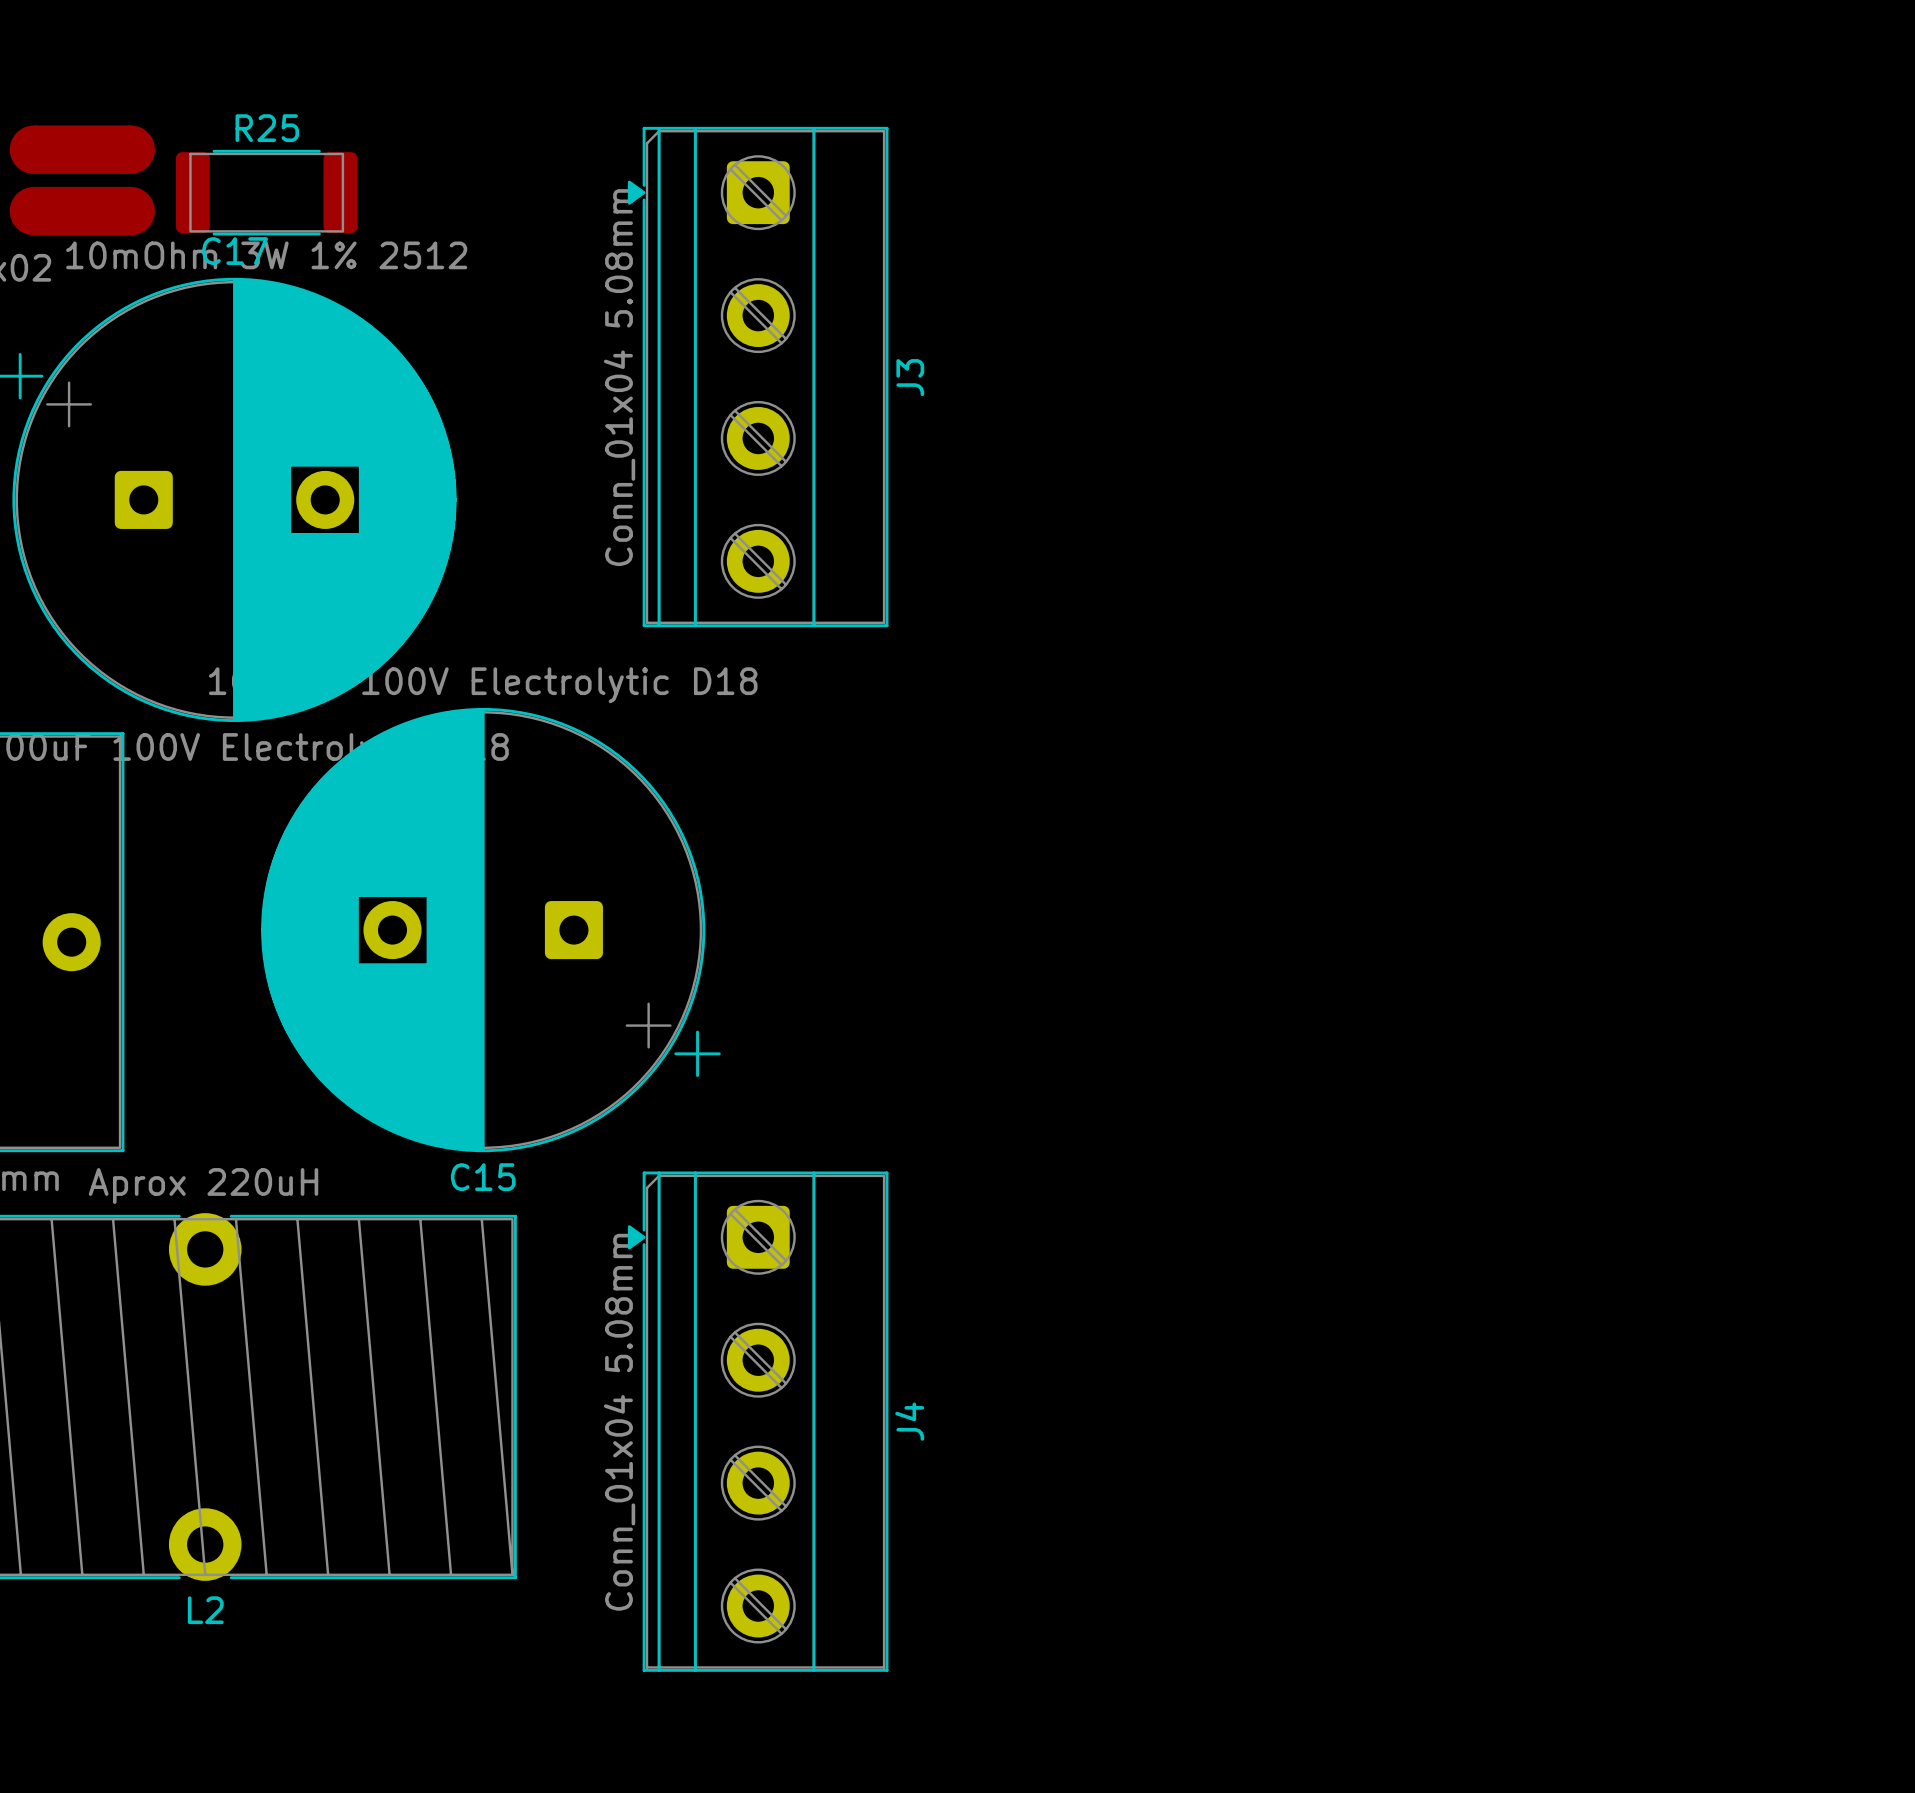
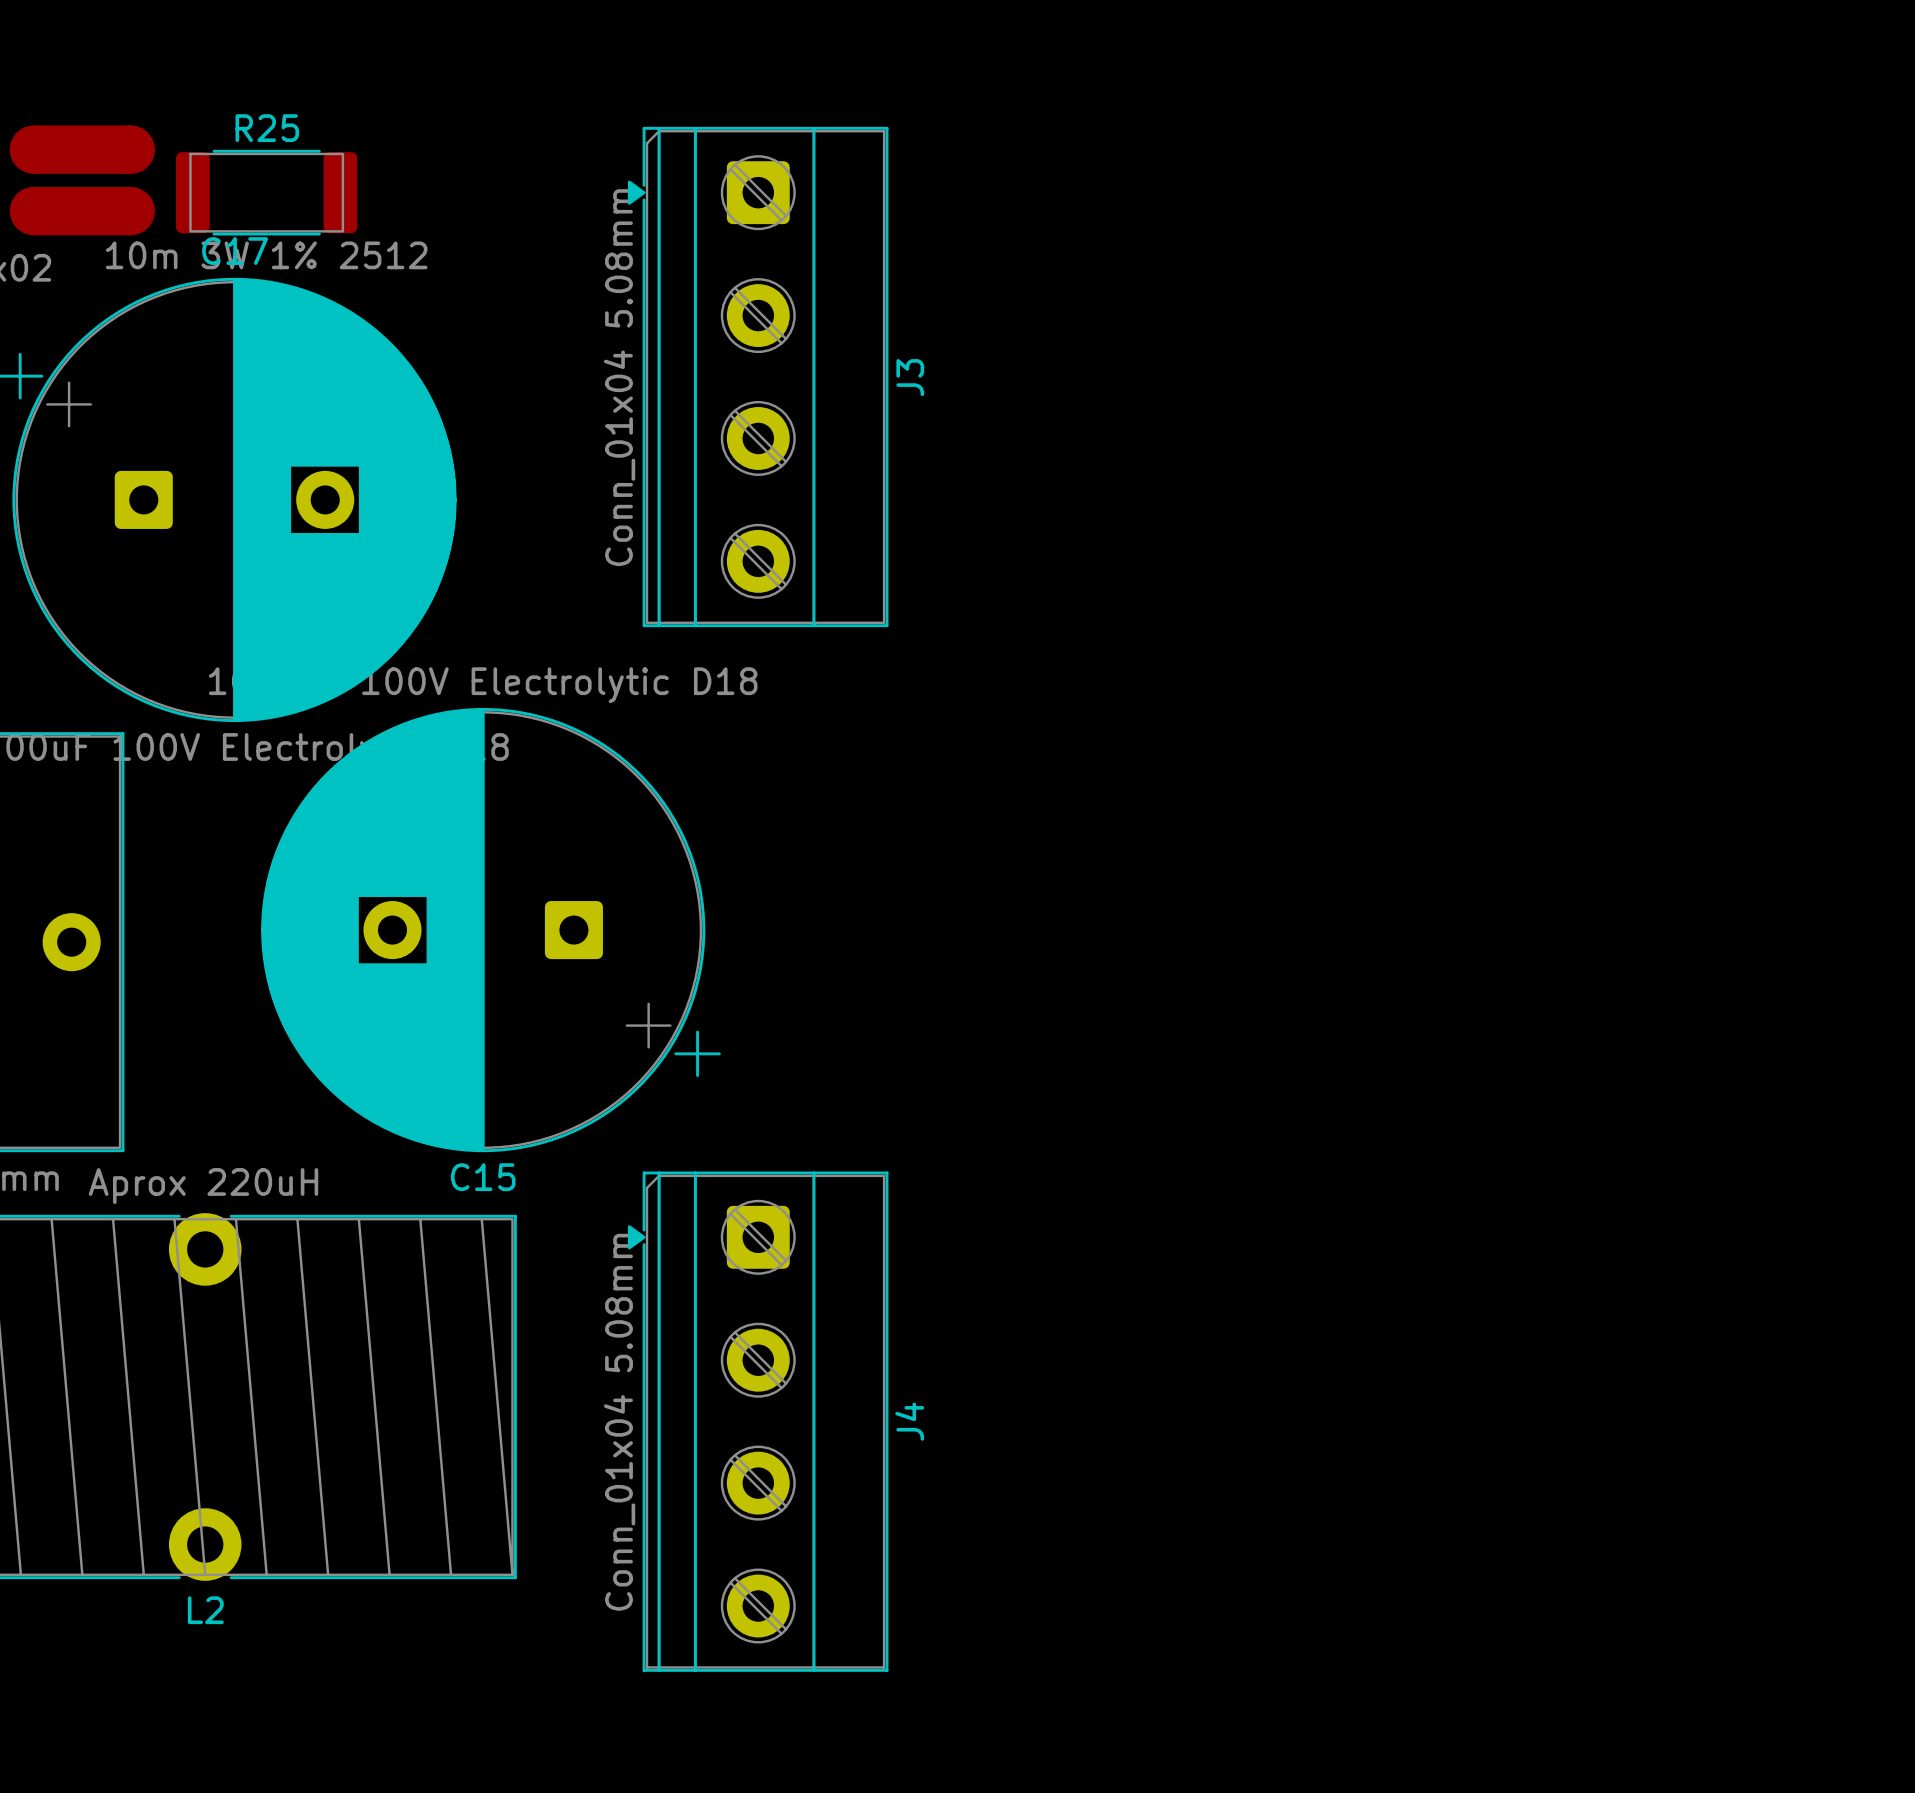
R25 value: 10mOhm 3W 1% 2512 (266, 255) -> 10m 3W 1% 2512 (266, 255)

